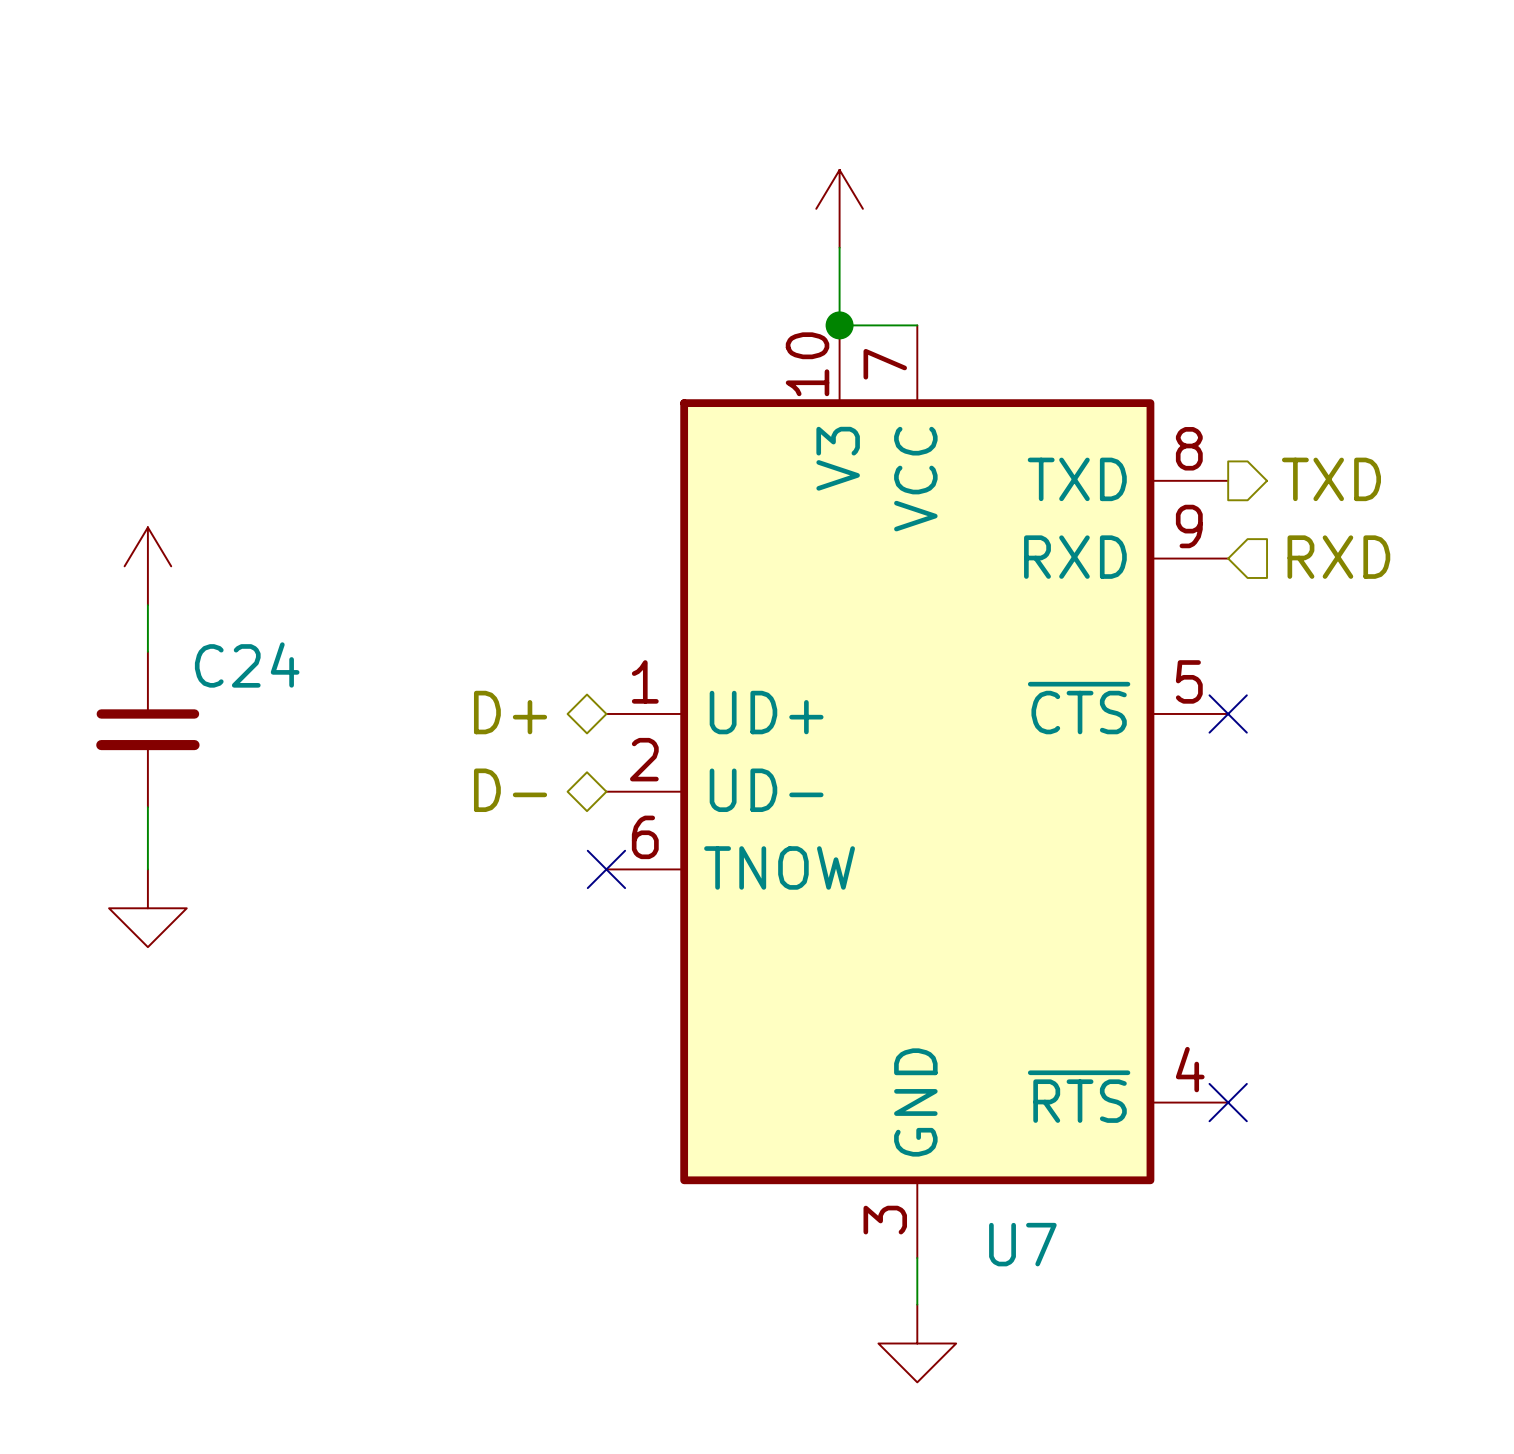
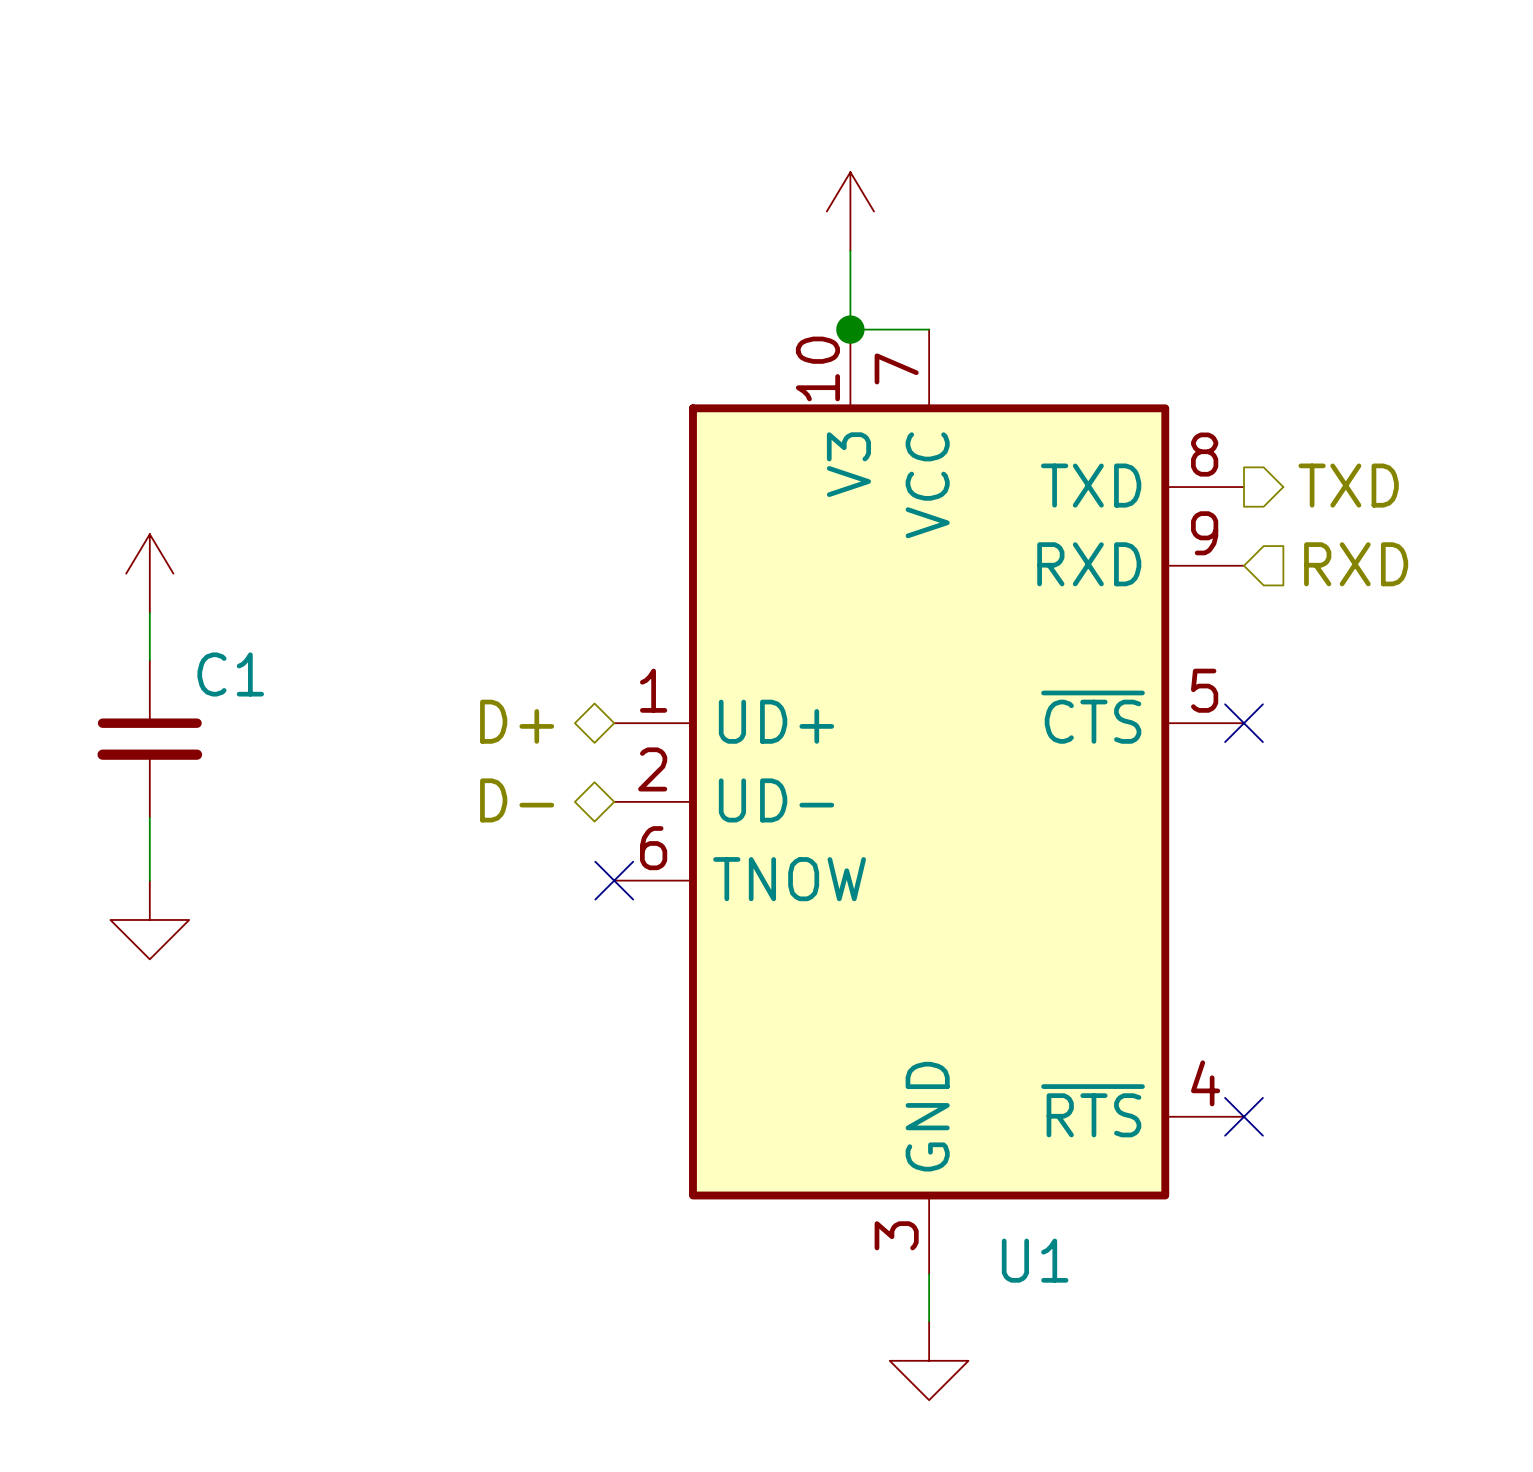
C24 name: C24 (247, 664) -> C1 (230, 674)
U7 name: U7 (1022, 1244) -> U1 (1035, 1260)

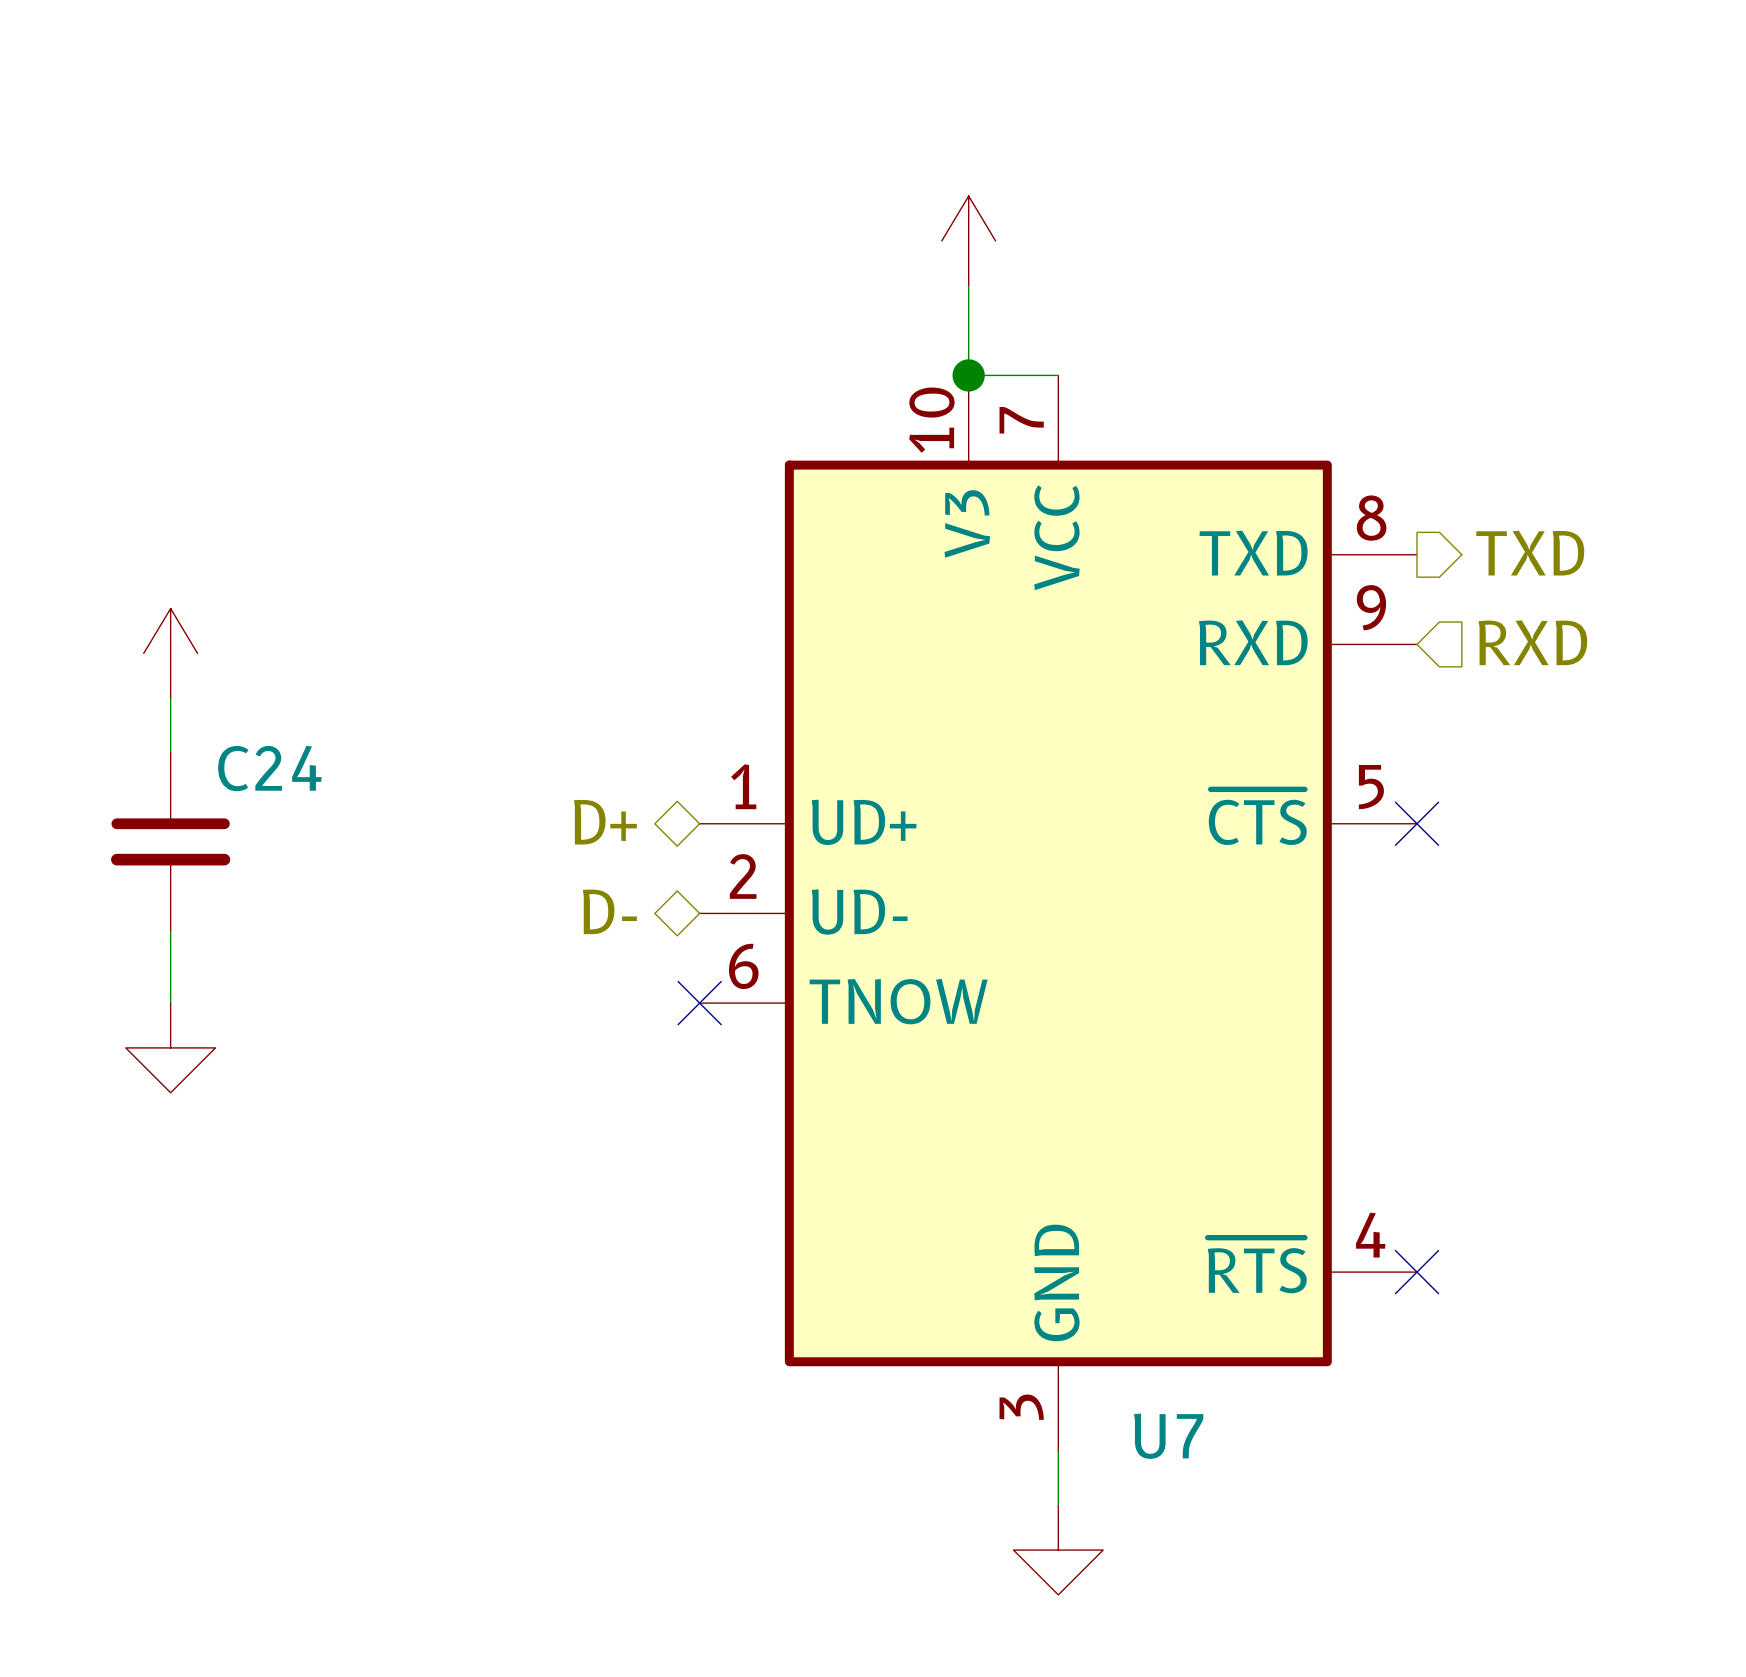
C1 name: C1 (230, 674) -> C24 (269, 768)
U1 name: U1 (1035, 1260) -> U7 (1168, 1436)

